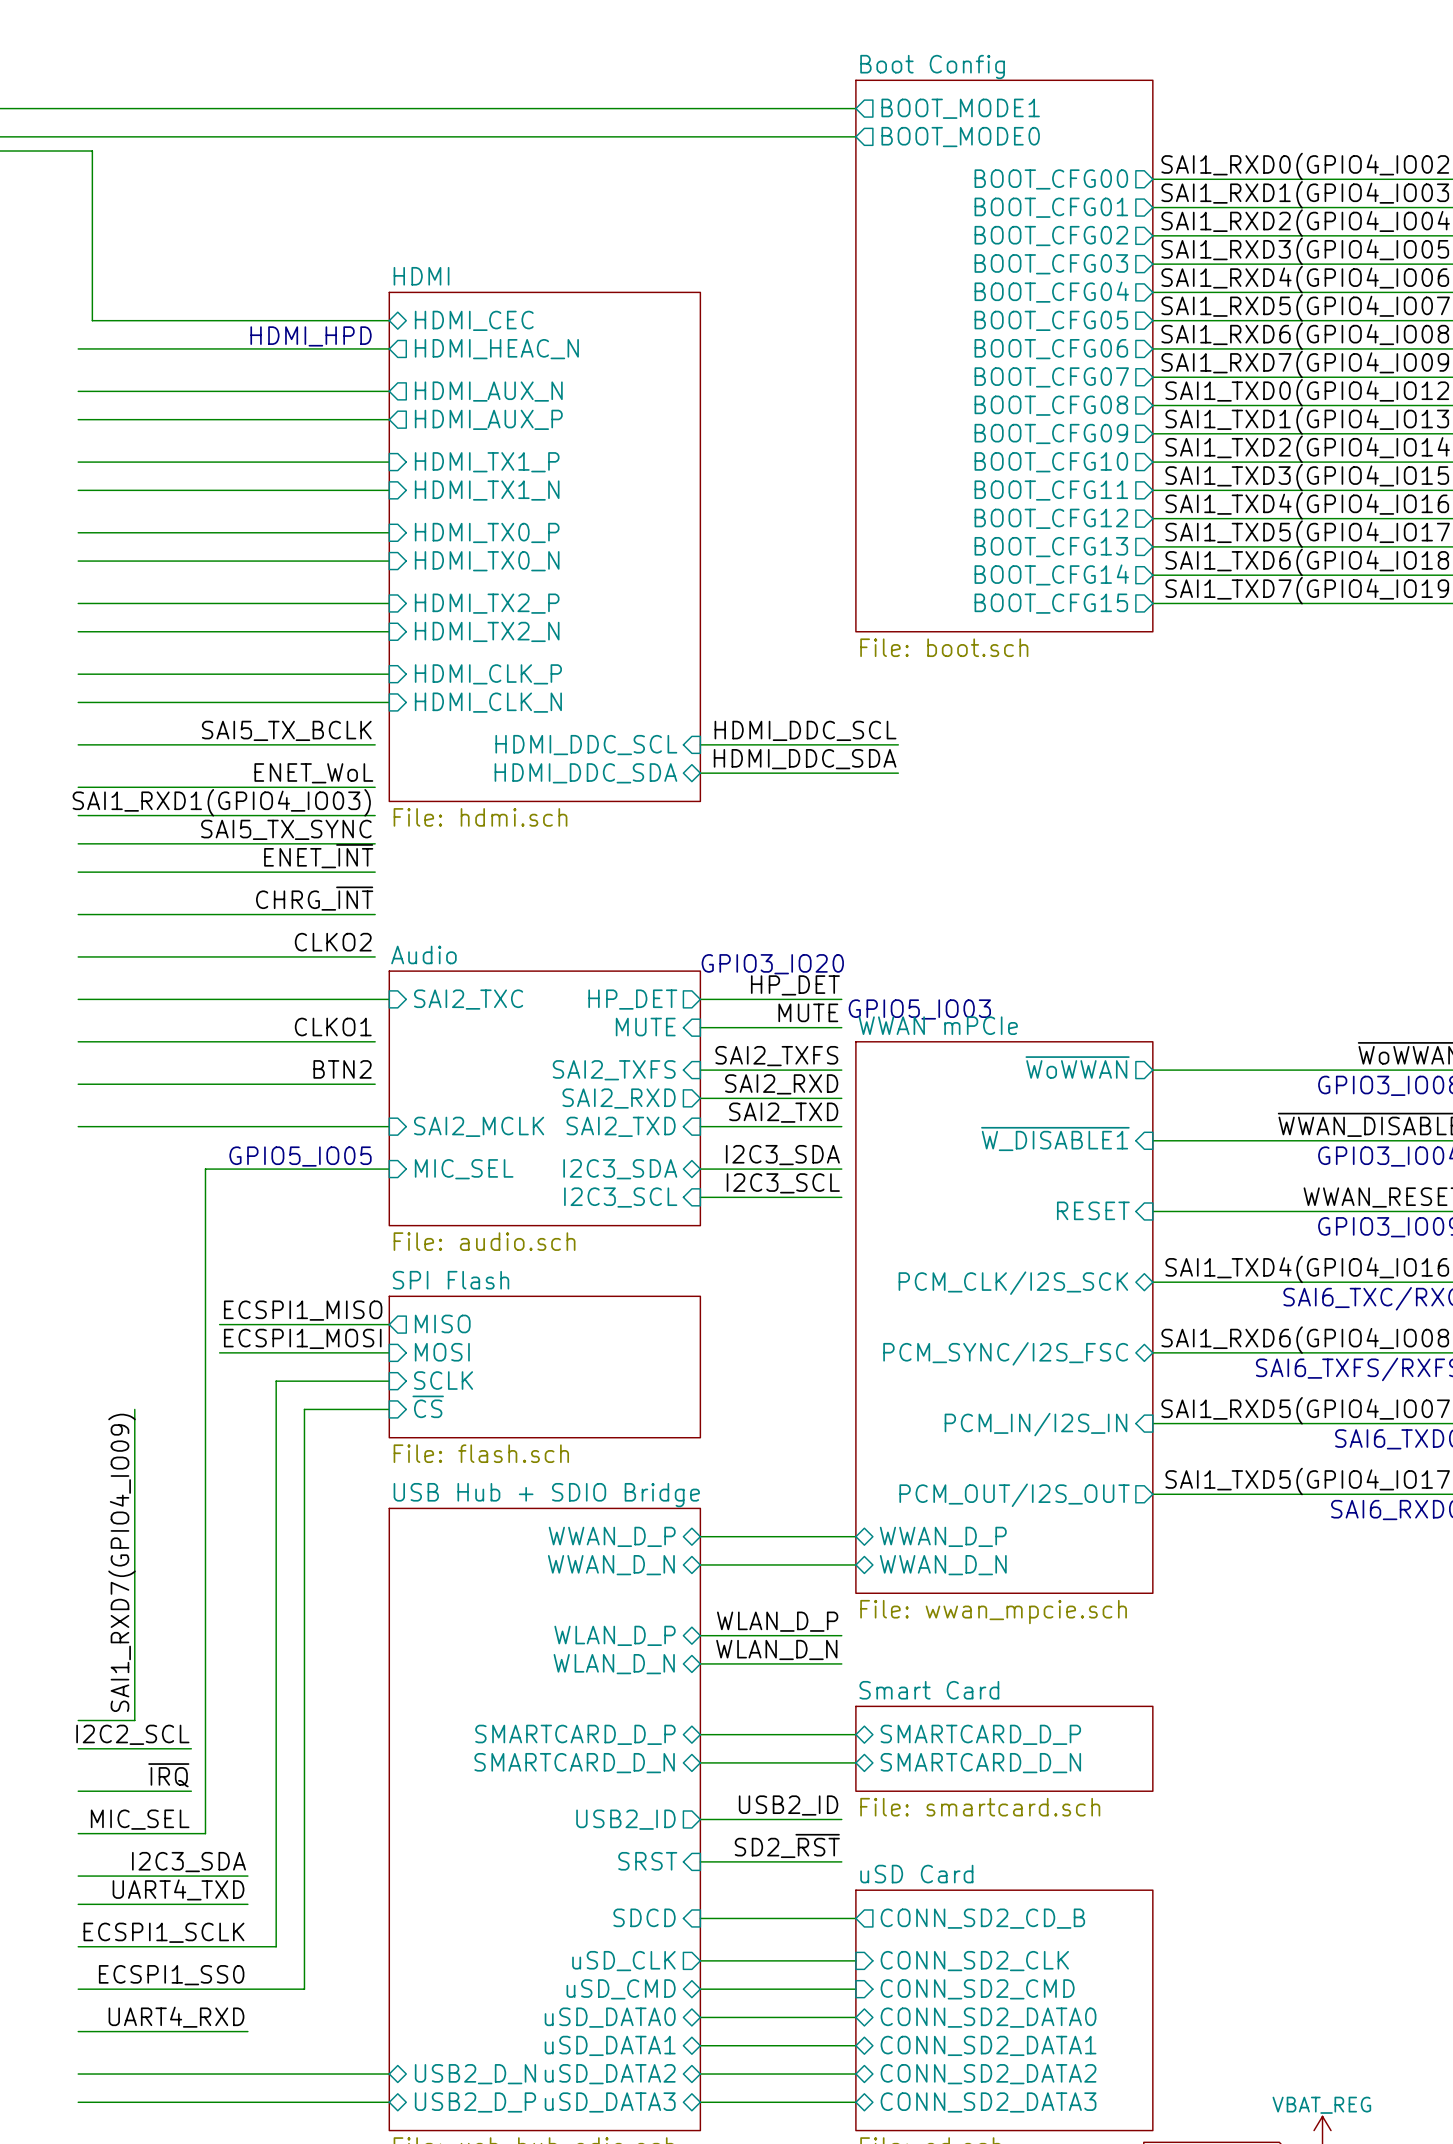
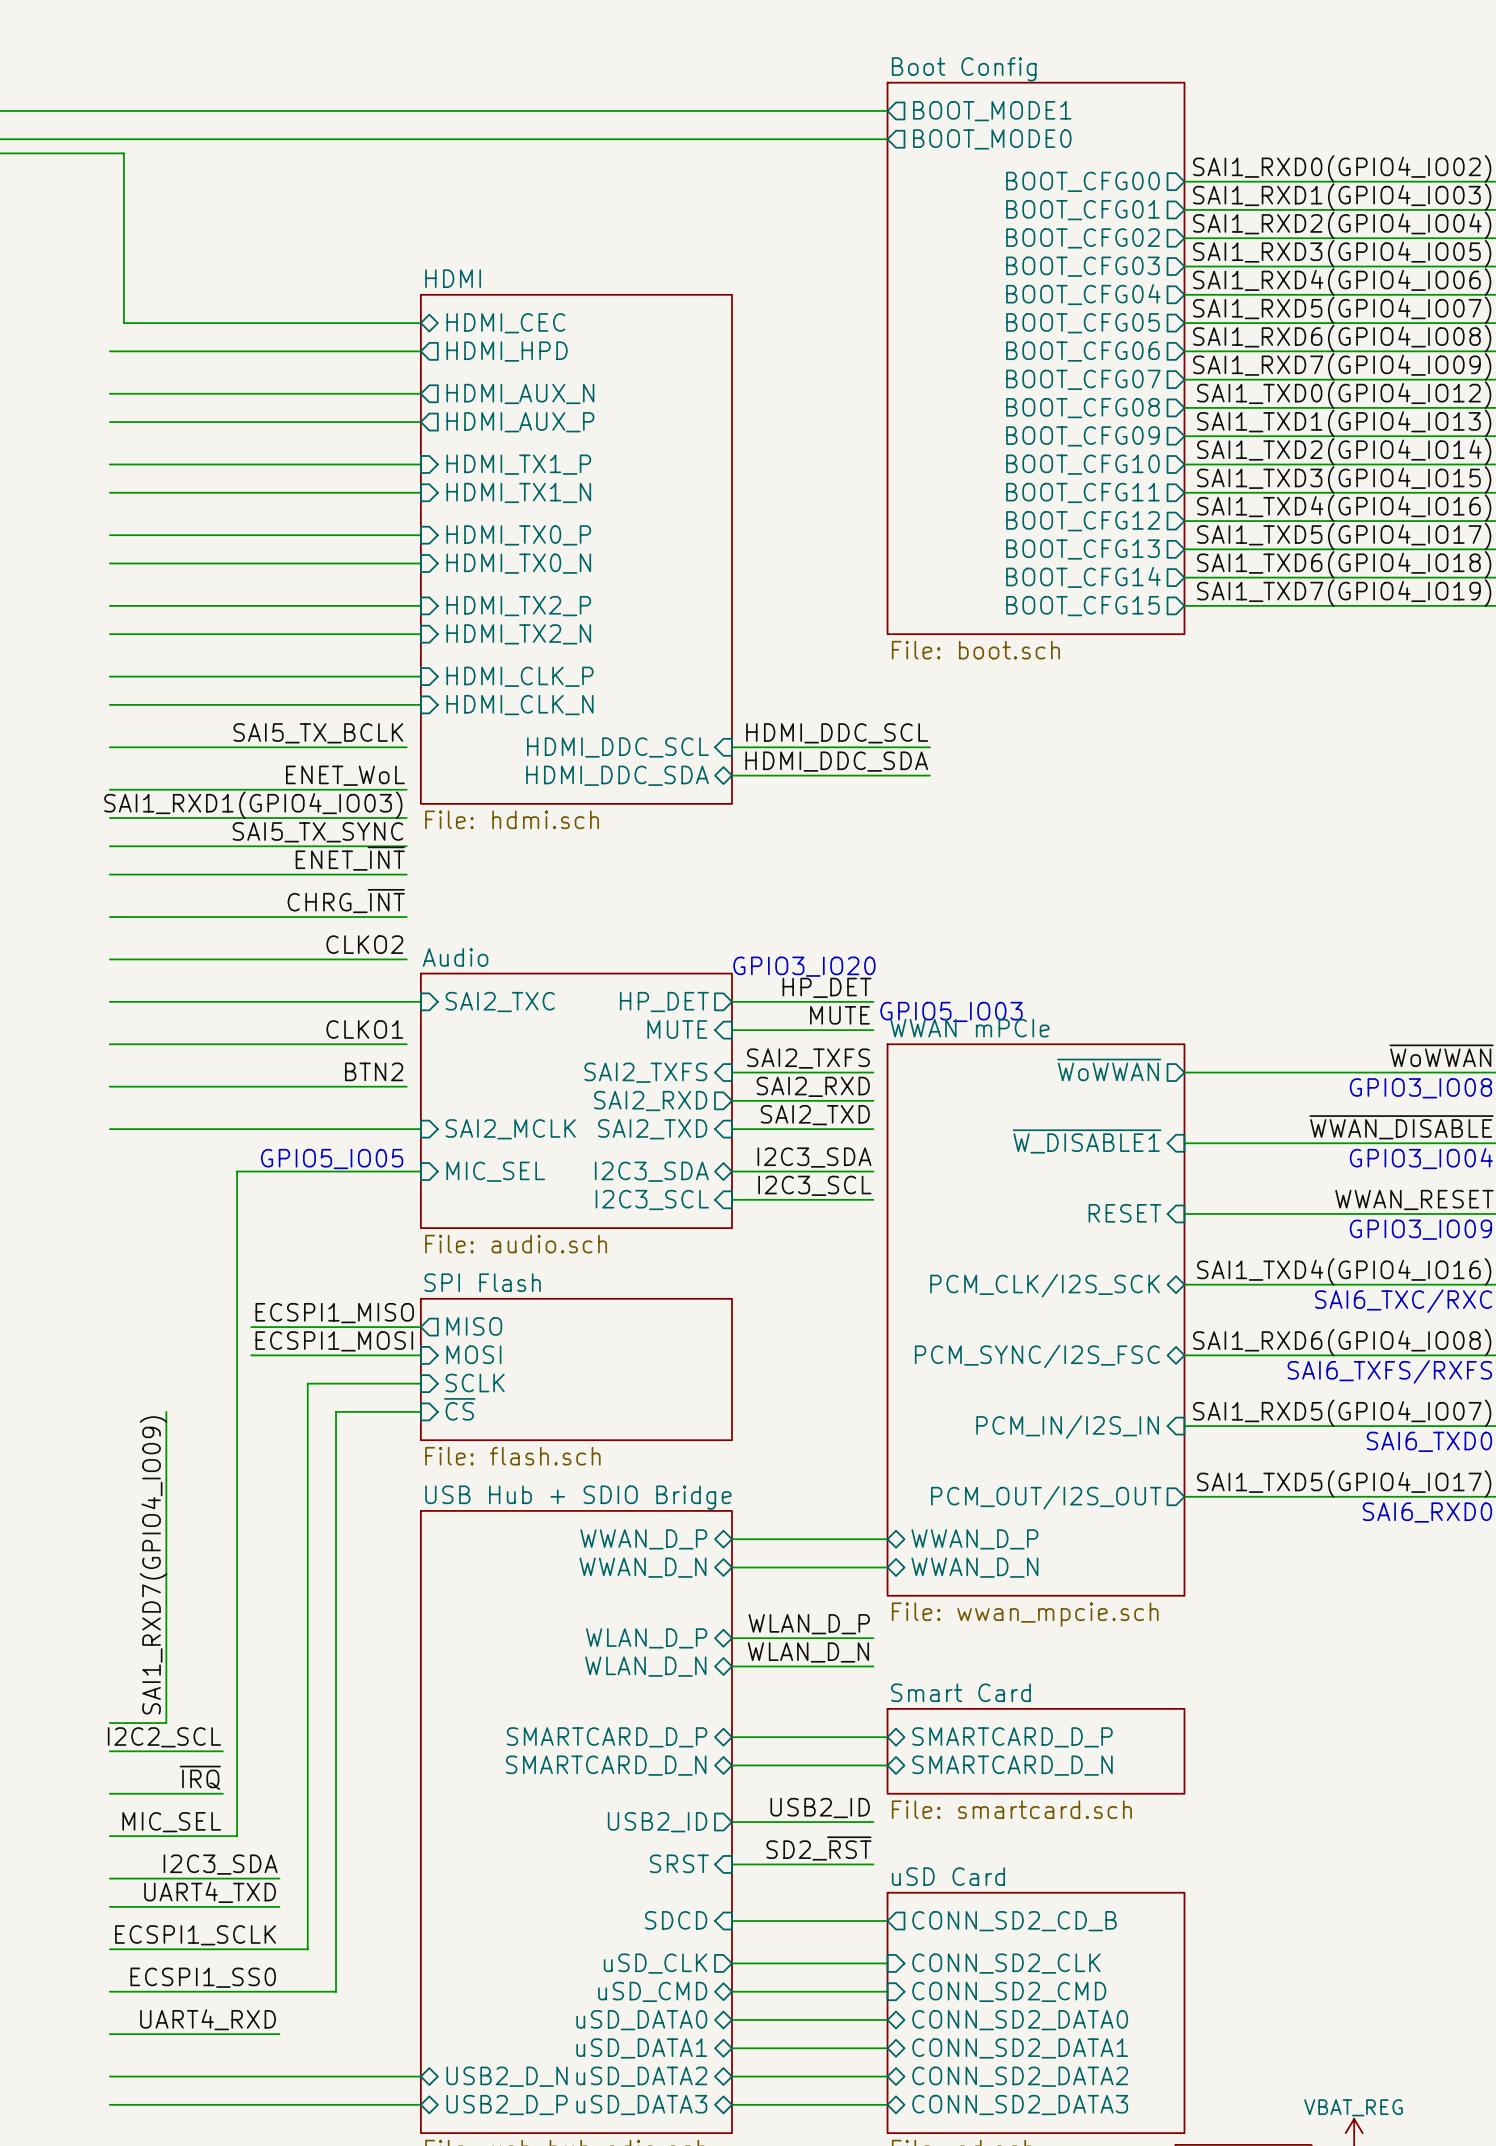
text: HDMI_HPD (311, 336) -> none
sheet pin: HDMI_HEAC_N (496, 349) -> HDMI_HPD (507, 351)

